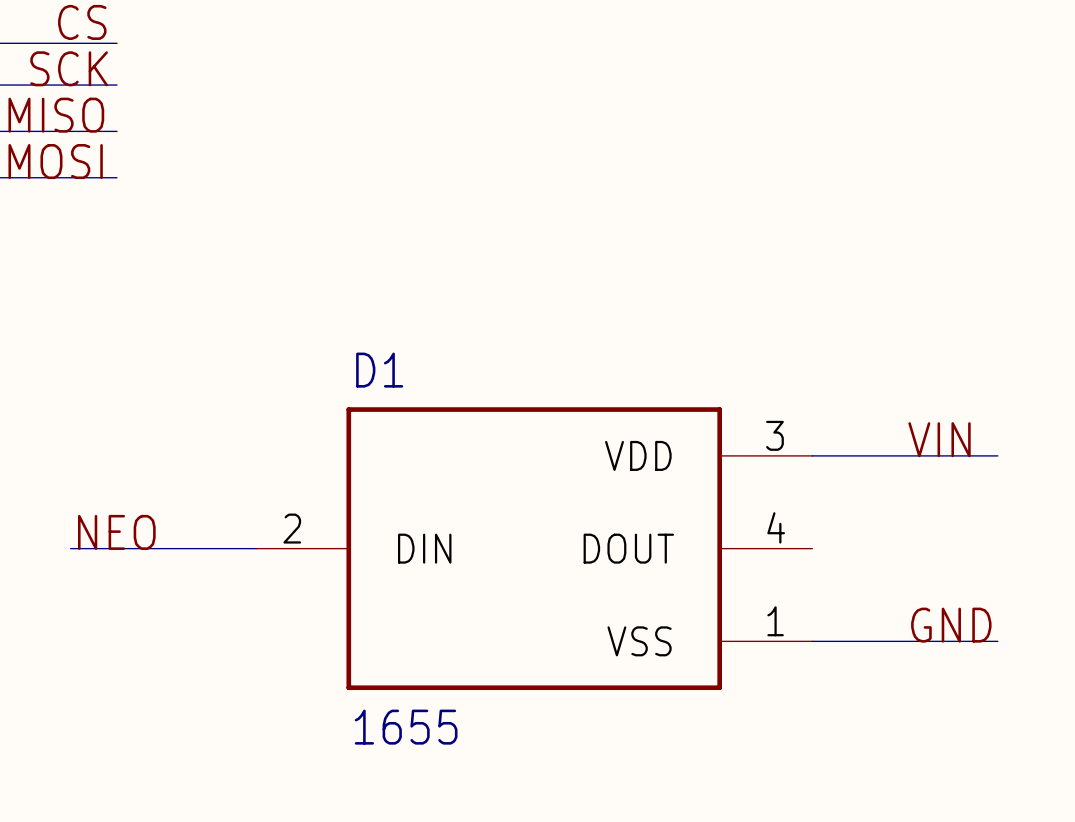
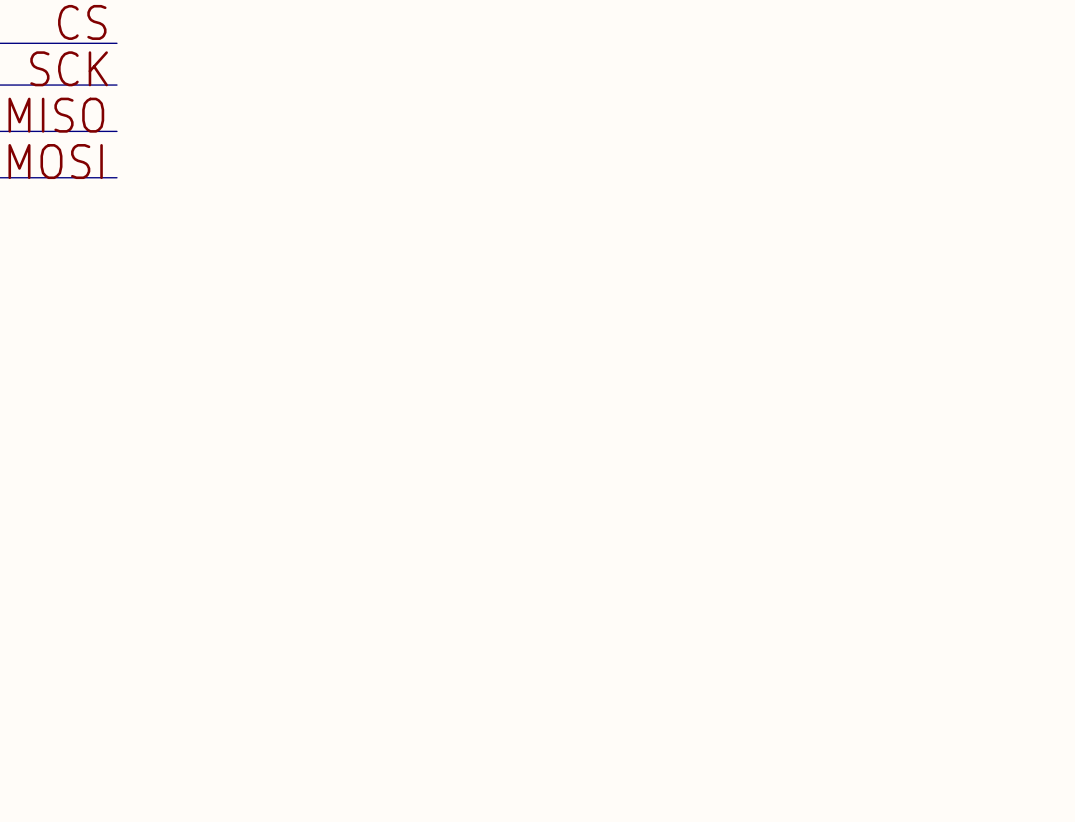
label: VIN (939, 439) -> none
wire: (812, 455) (997, 455) -> none
label: NEO (116, 532) -> none
wire: (70, 548) (256, 548) -> none
D1: 1655 (534, 548) -> none
label: GND (951, 625) -> none
wire: (812, 641) (997, 641) -> none

